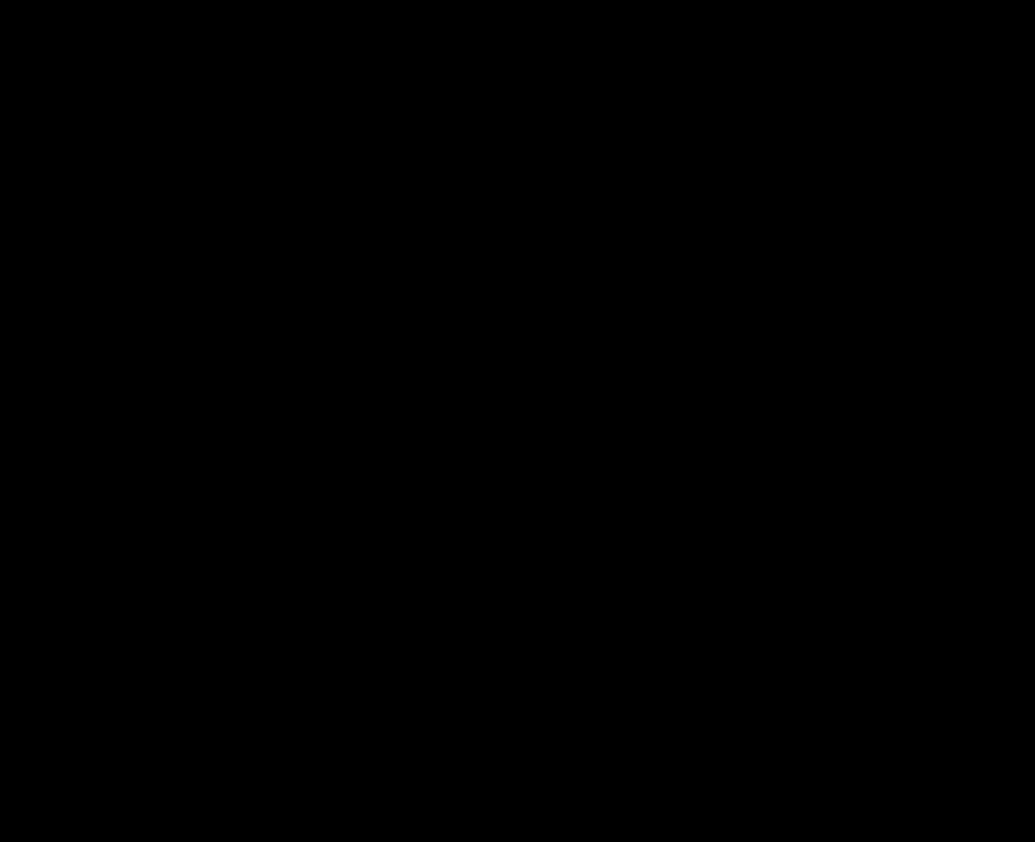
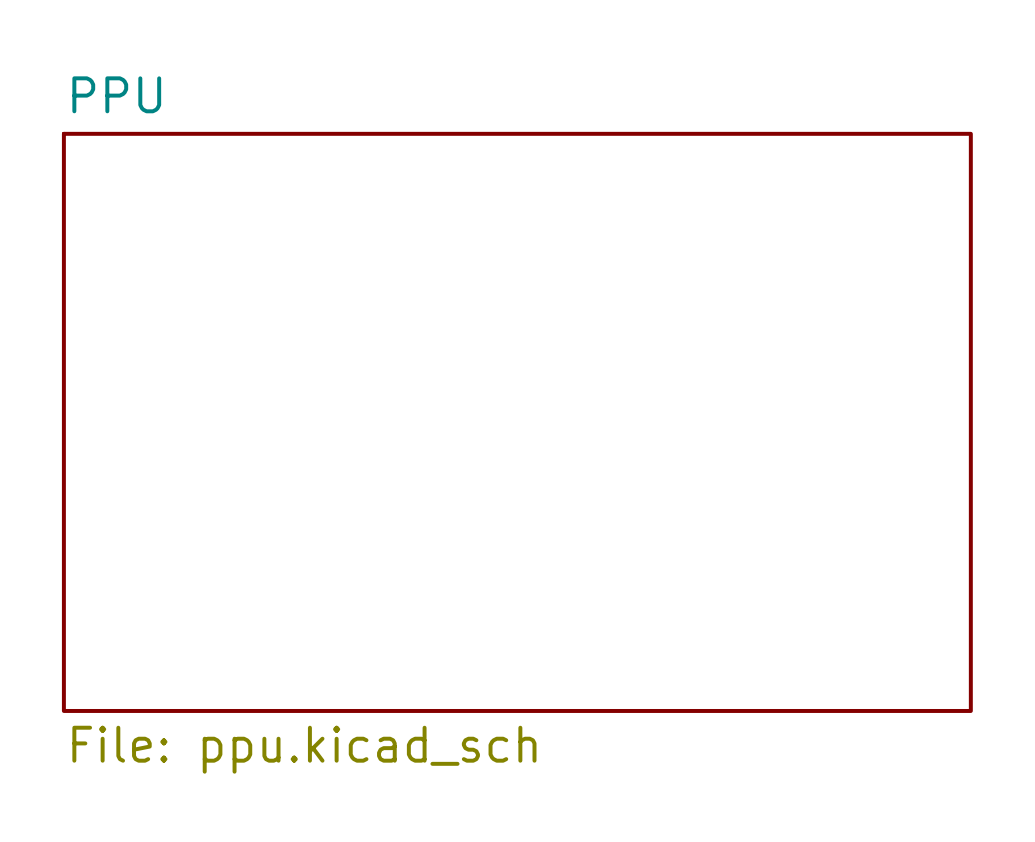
sheet PPU: none -> File: ppu.kicad_sch (517, 422)

